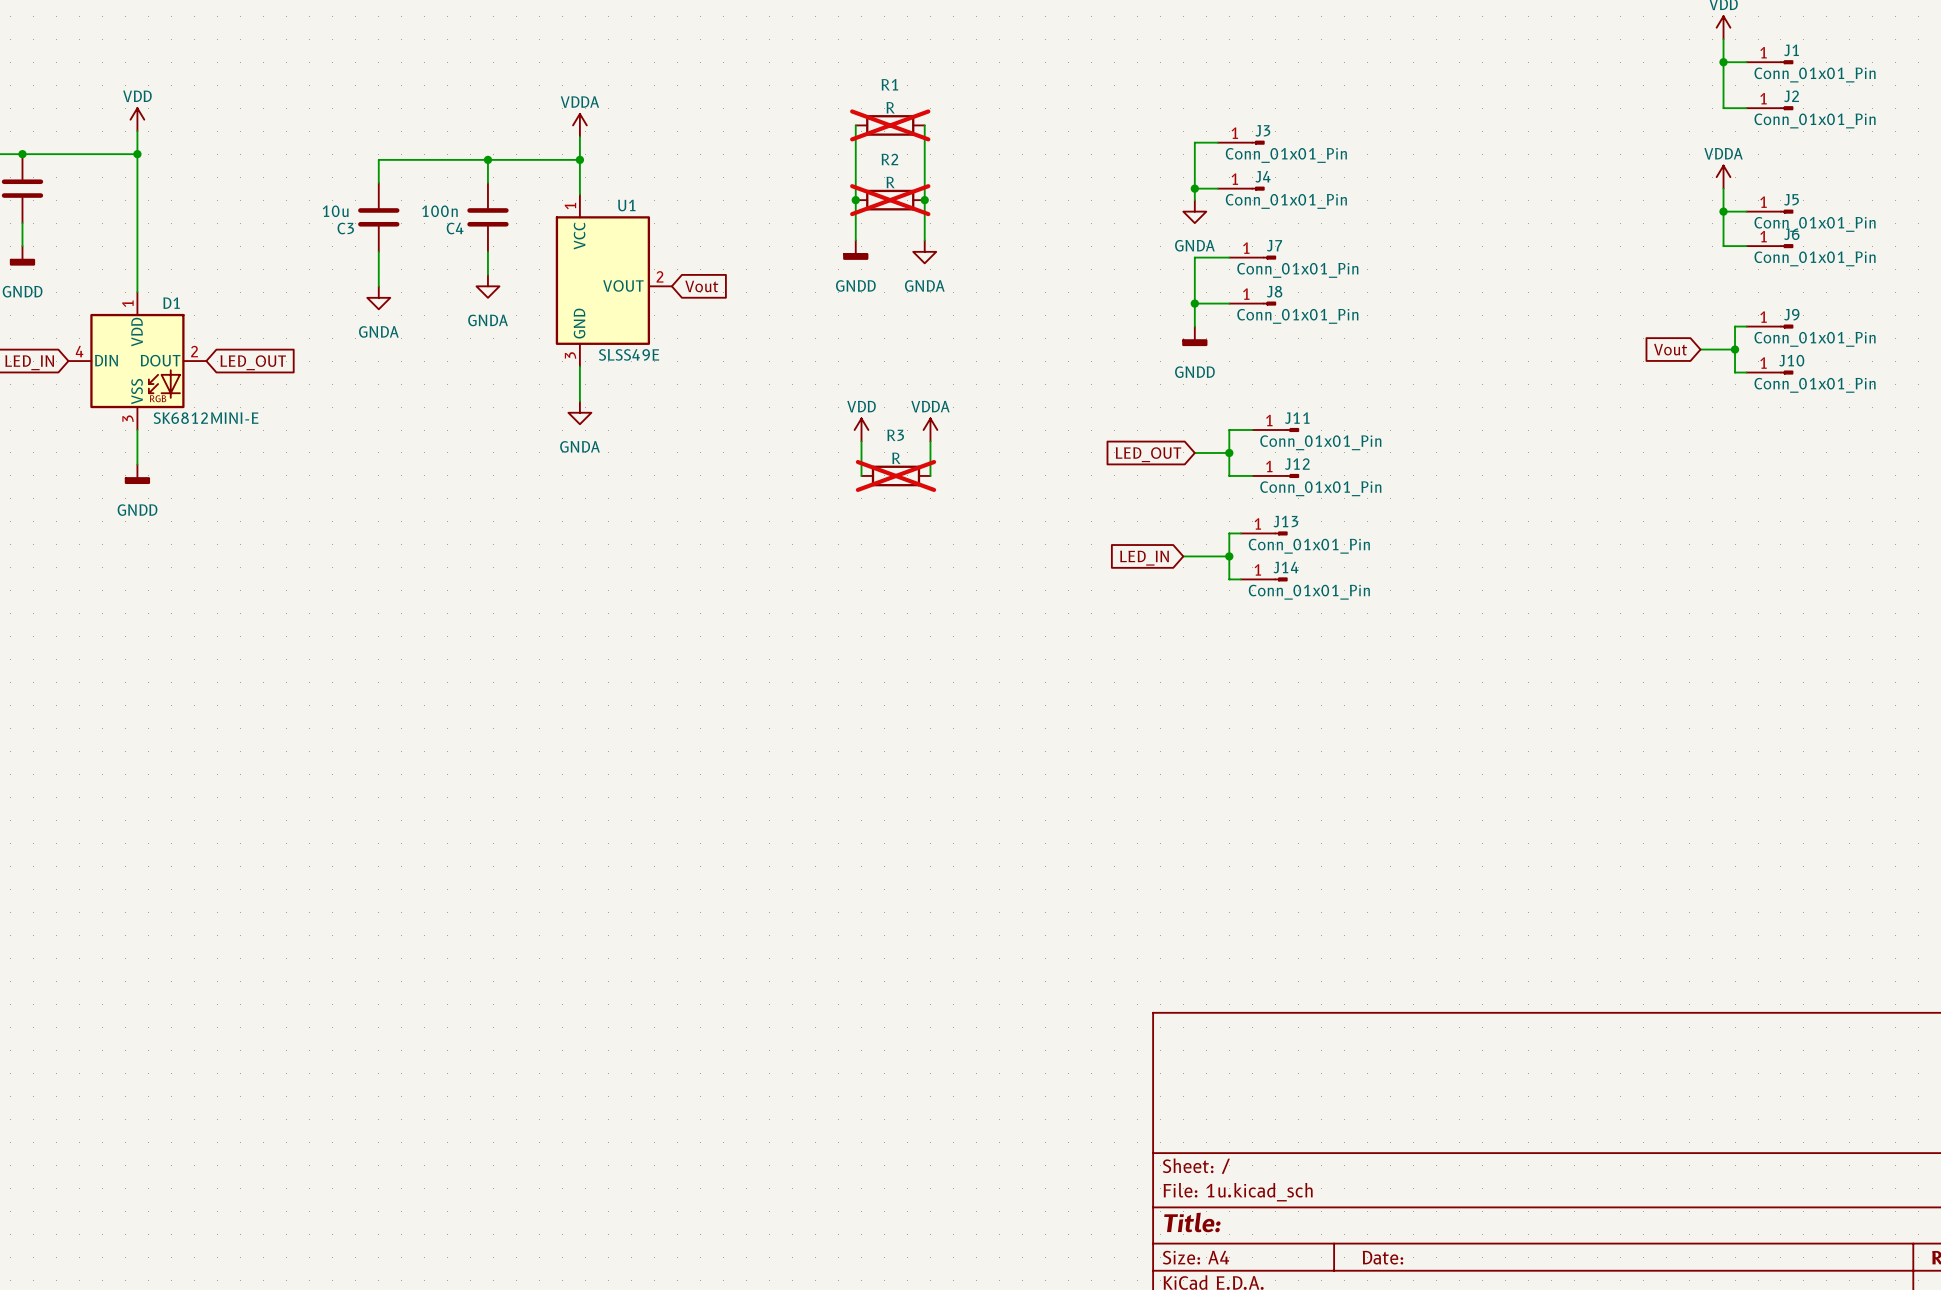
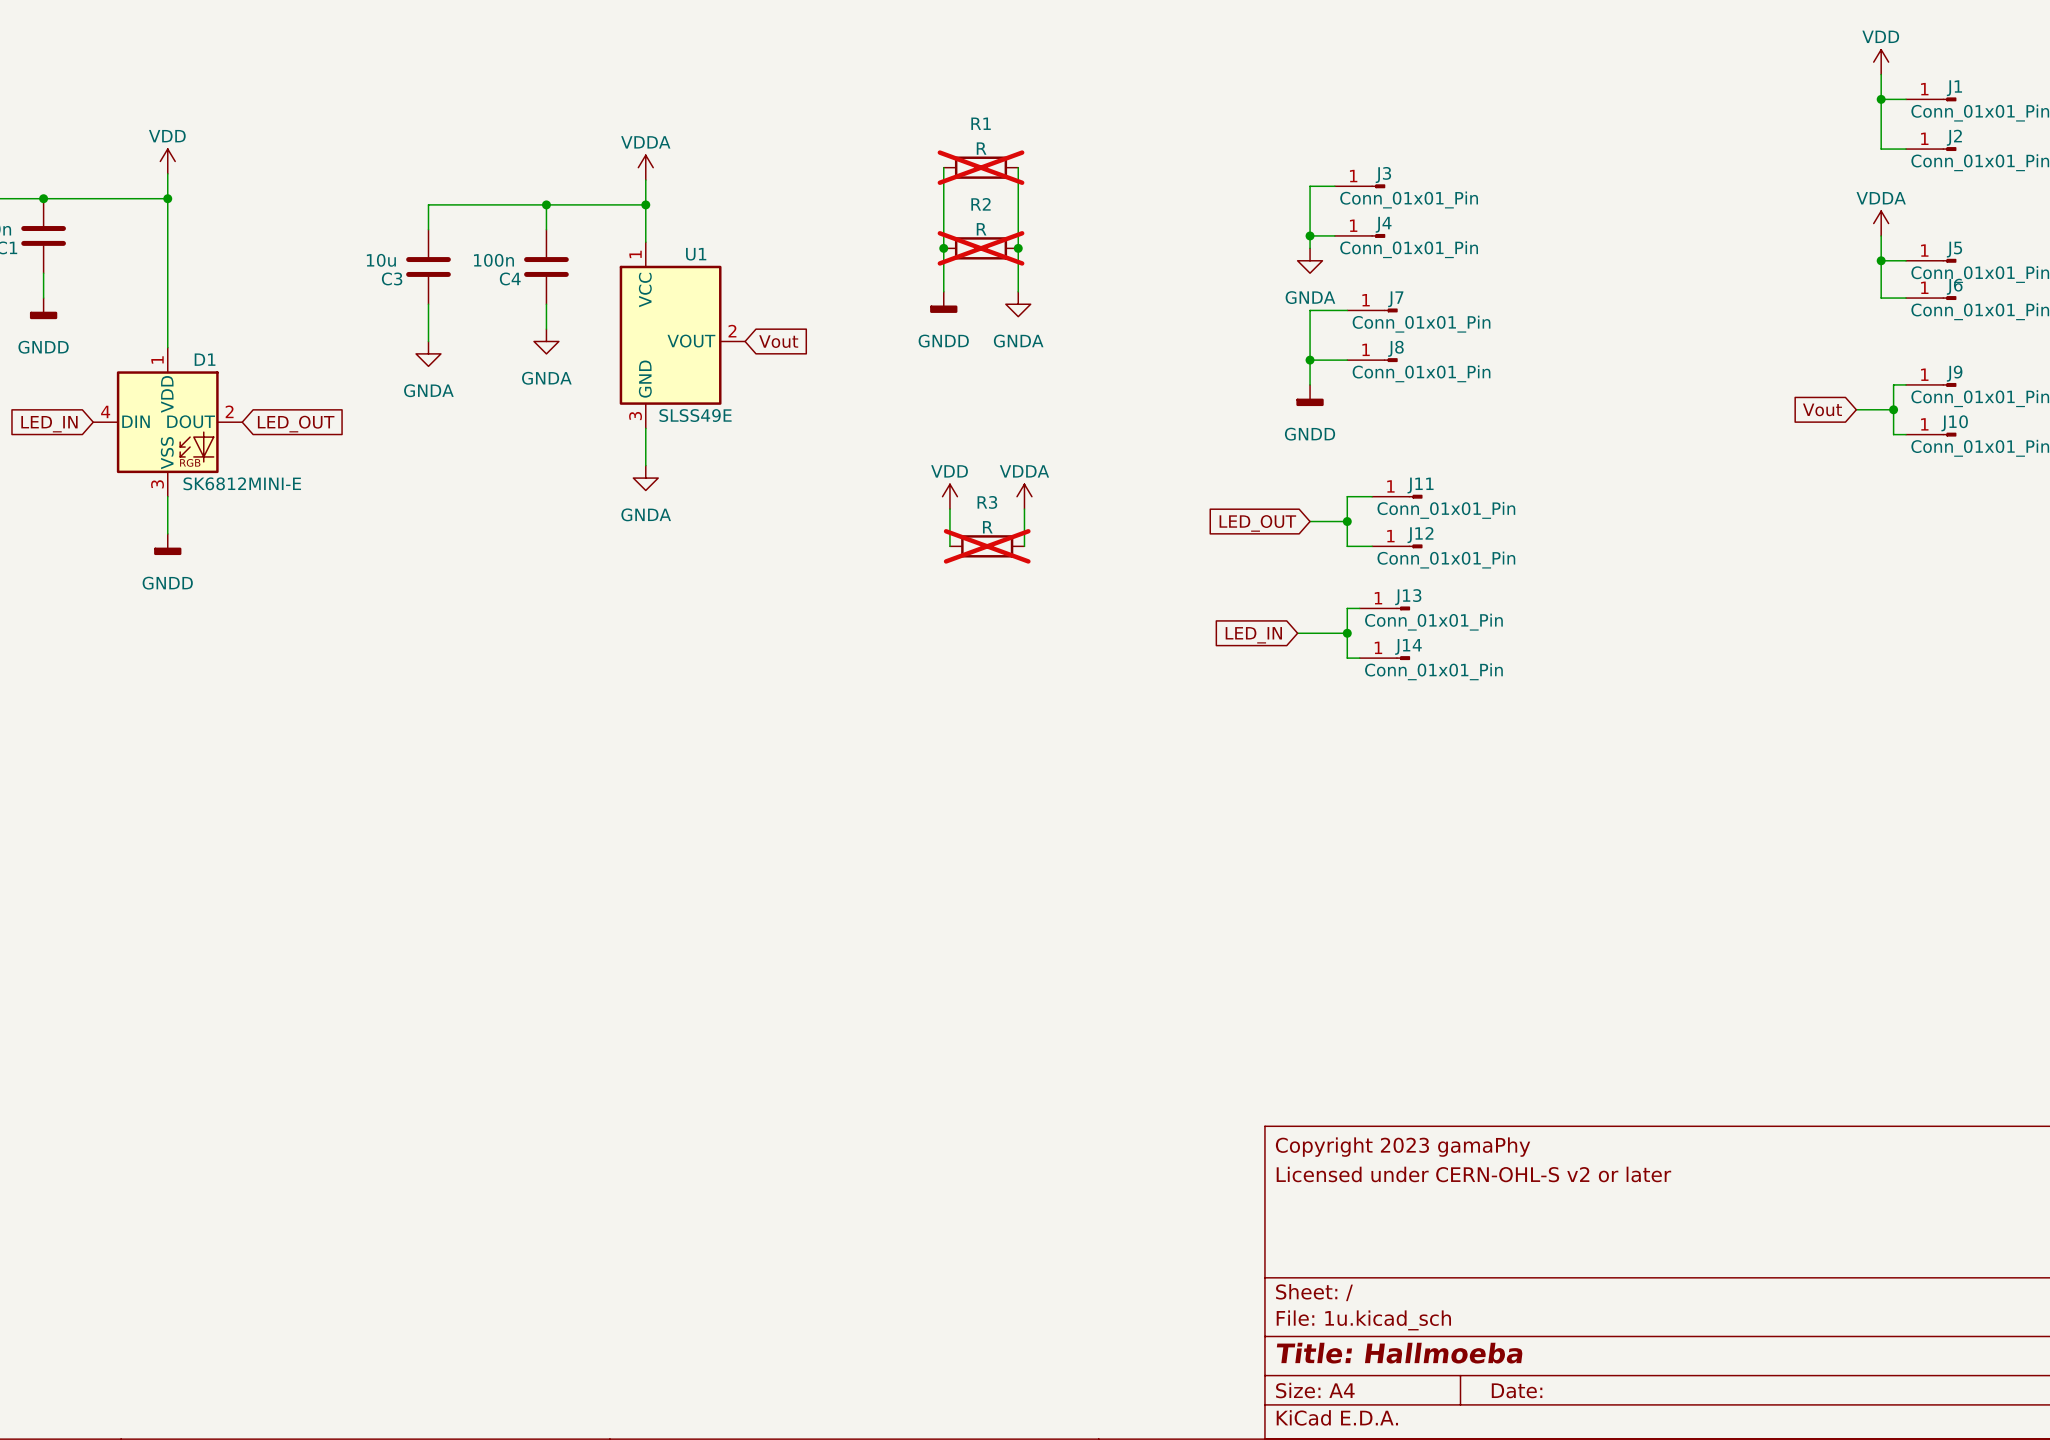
title block: none -> Copyright 2023 gamaPhy (1403, 1147)
title block: none -> Licensed under CERN-OHL-S v2 or later (1473, 1174)
title block: Title: (1192, 1222) -> Title: Hallmoeba (1399, 1353)

